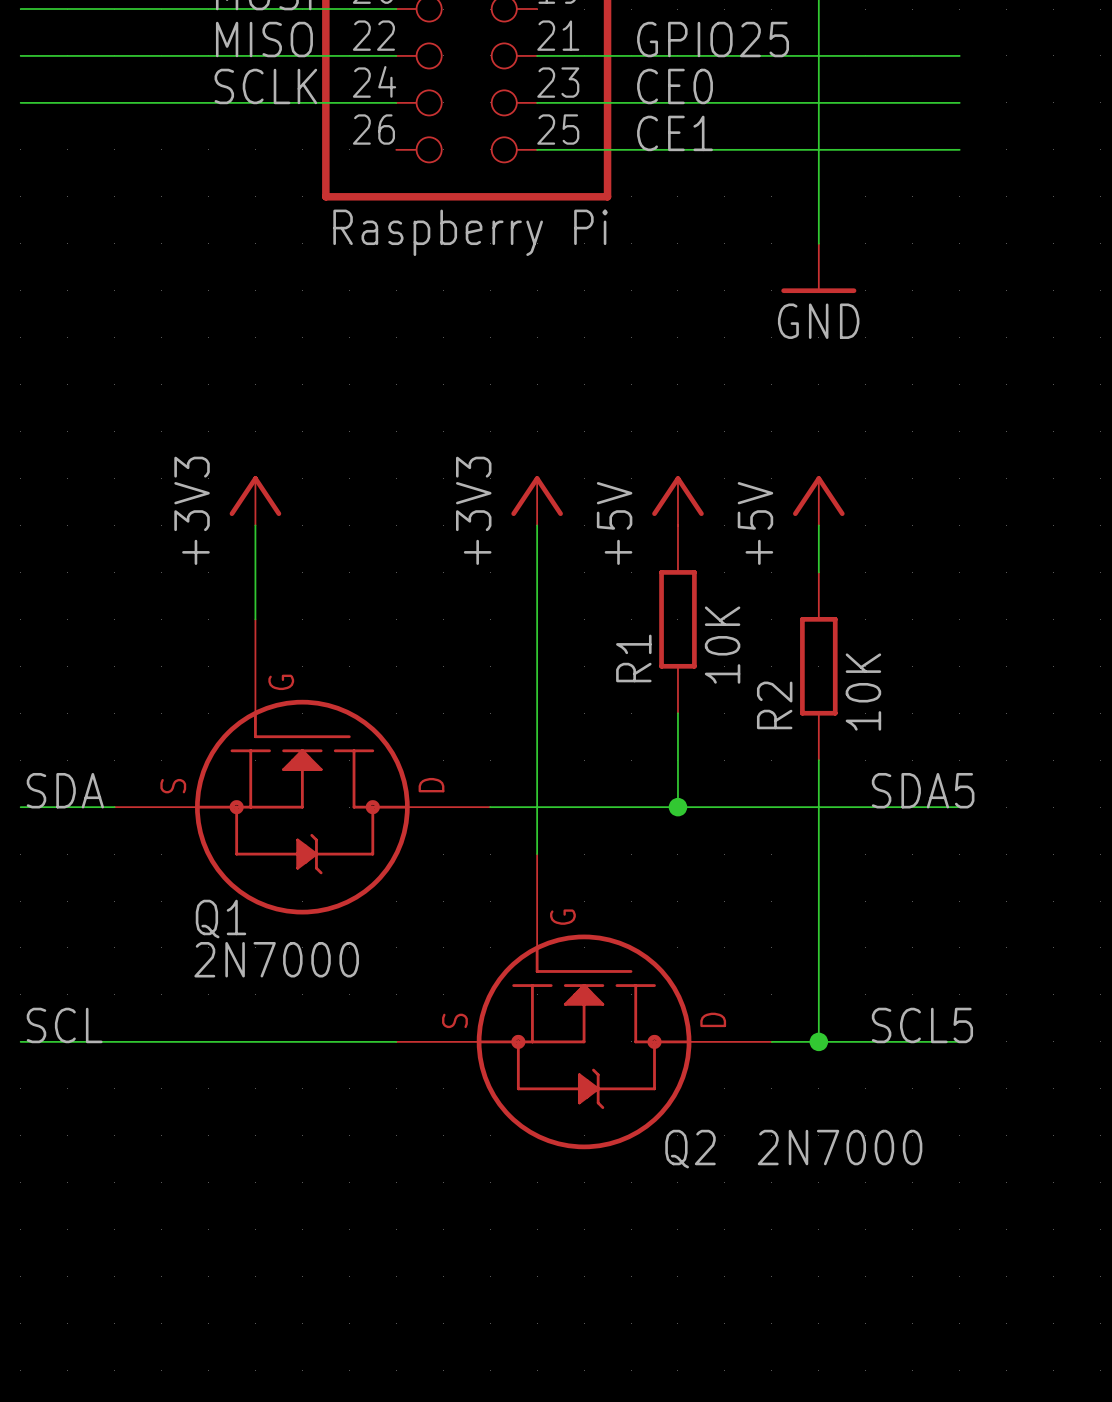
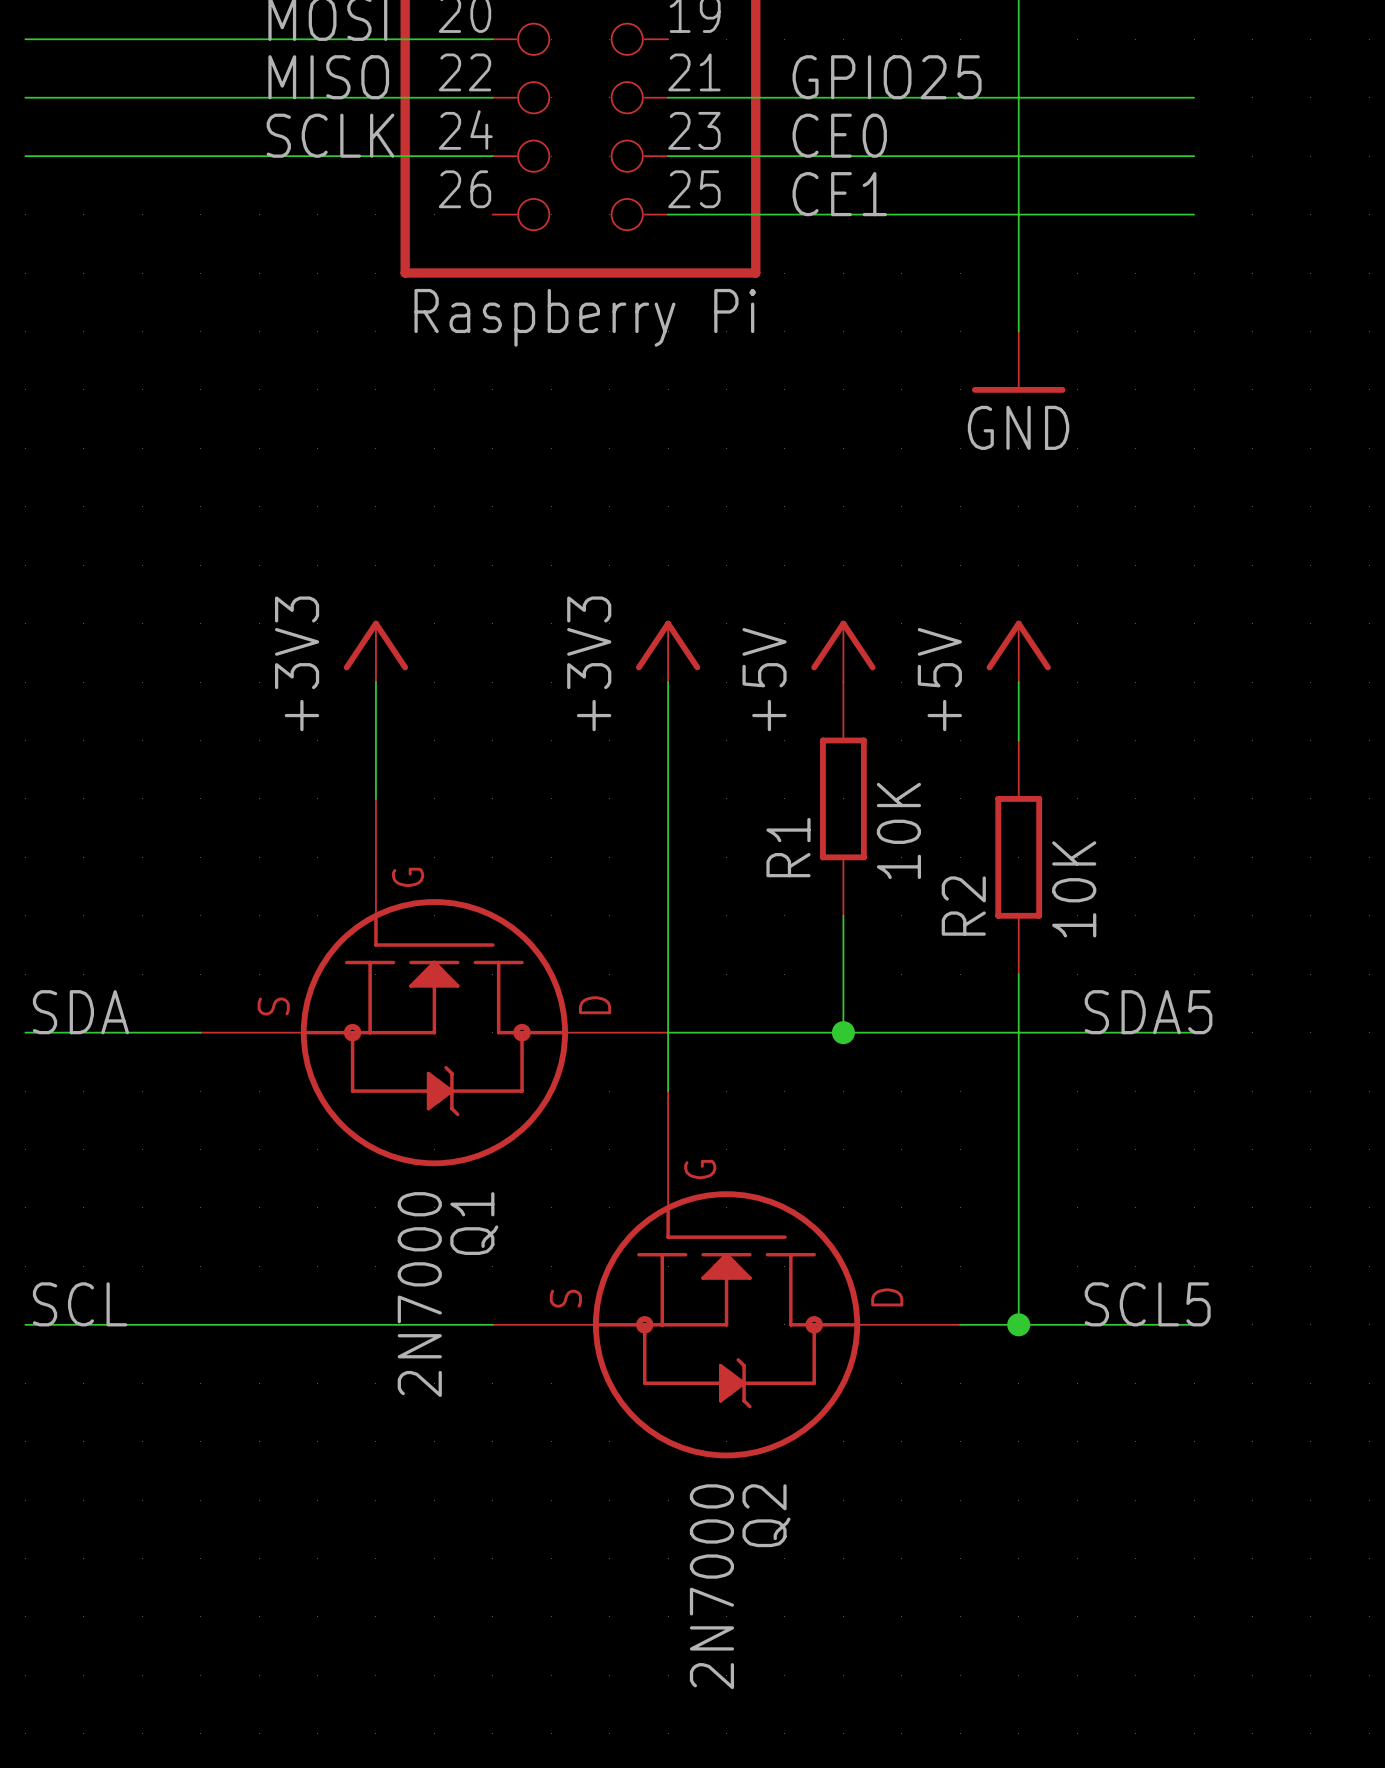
power symbol position: +3V3 (255, 500) -> +3V3 (375, 651)
wire: (255, 525) (255, 619) -> (375, 682) (375, 798)
Q1 position: (302, 766) -> (434, 982)
Q1 name rotation: 0° (221, 919) -> 90° counterclockwise (474, 1223)
Q1 name position: Q1 (221, 919) -> Q1 (474, 1223)
Q1 value rotation: 0° (276, 959) -> 90° counterclockwise (419, 1294)
Q2 value rotation: 0° (840, 1147) -> 90° counterclockwise (711, 1586)
Q2 value position: 2N7000 (840, 1147) -> 2N7000 (711, 1586)
Q2 name rotation: 0° (690, 1149) -> 90° counterclockwise (766, 1515)
Q2 name position: Q2 (690, 1149) -> Q2 (766, 1515)

